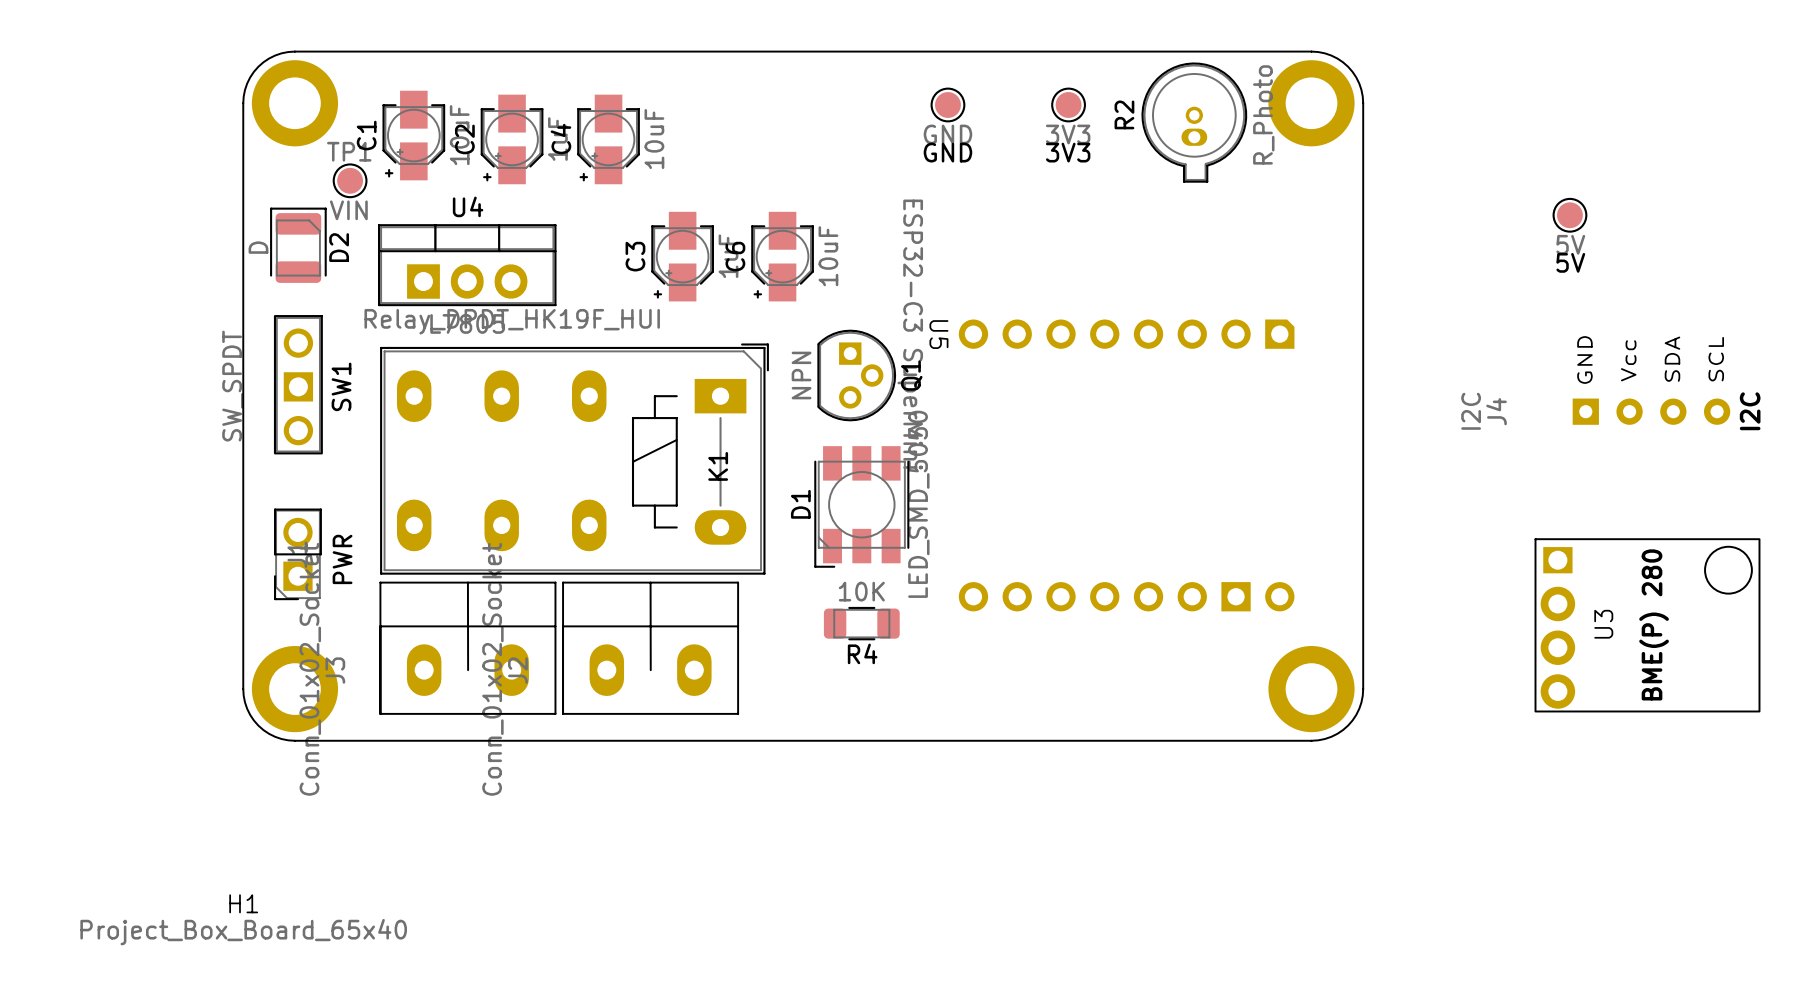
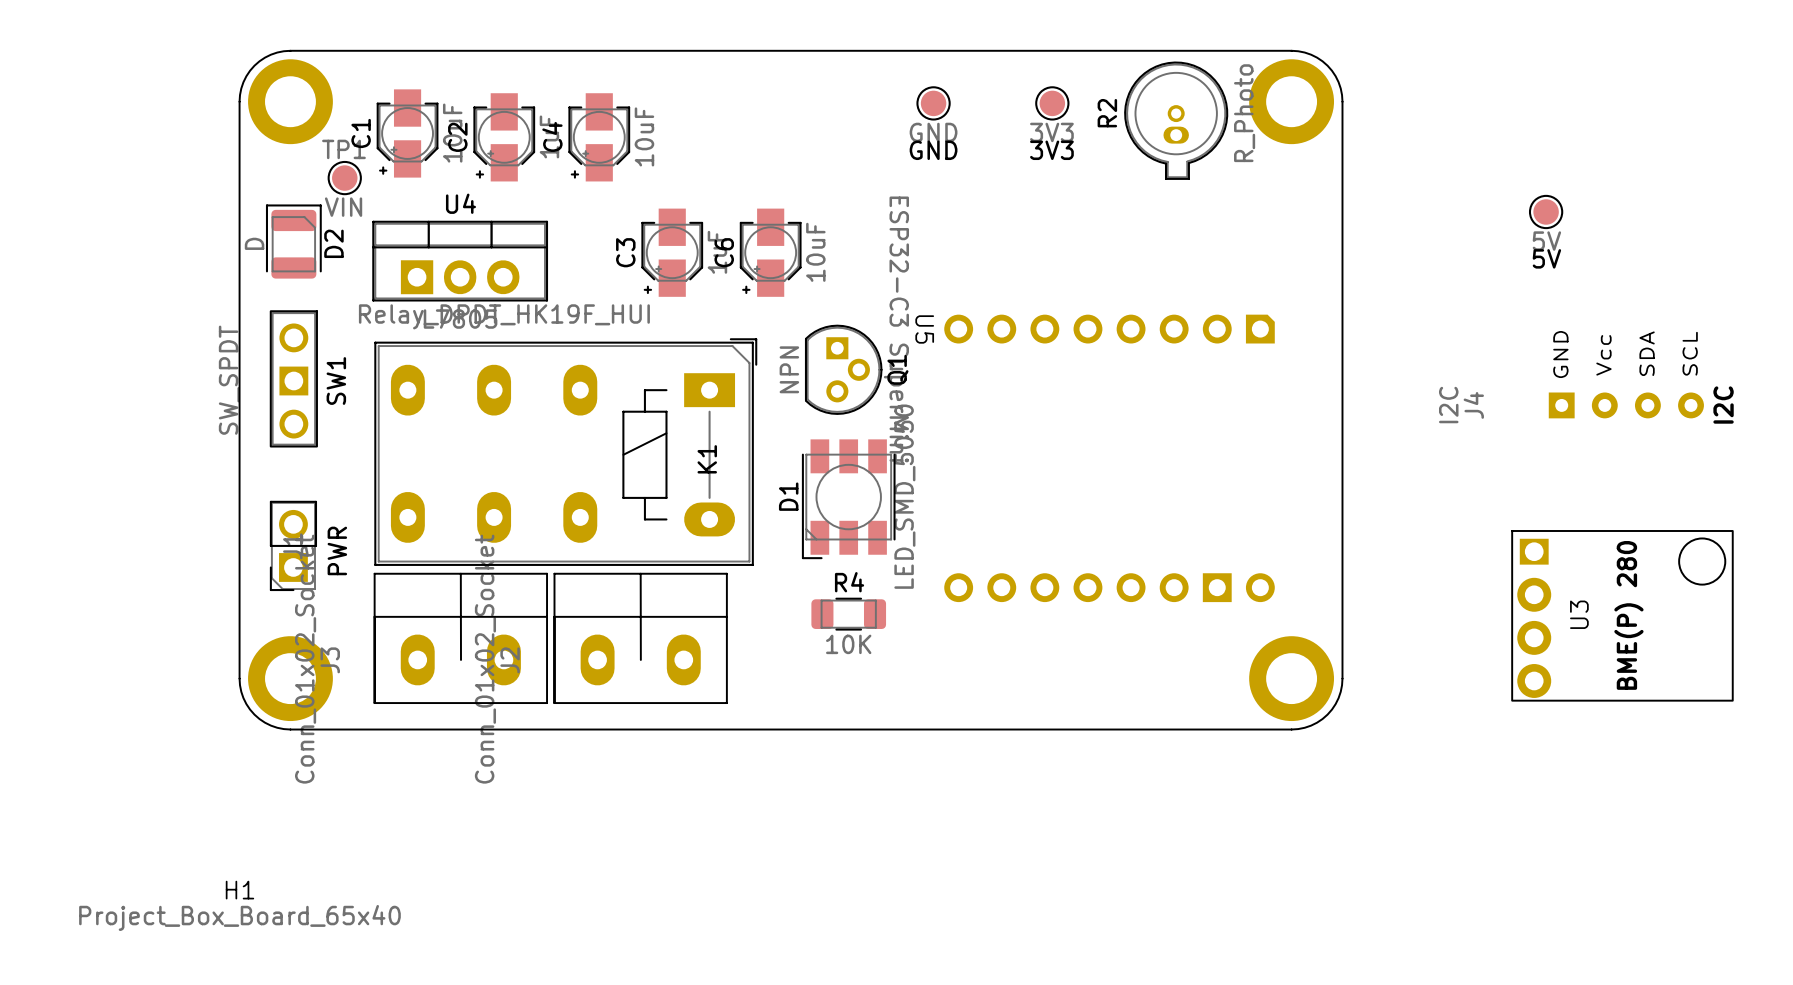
R4 value position: 10K (861, 591) -> 10K (848, 644)
R4 name position: R4 (862, 653) -> R4 (849, 582)

